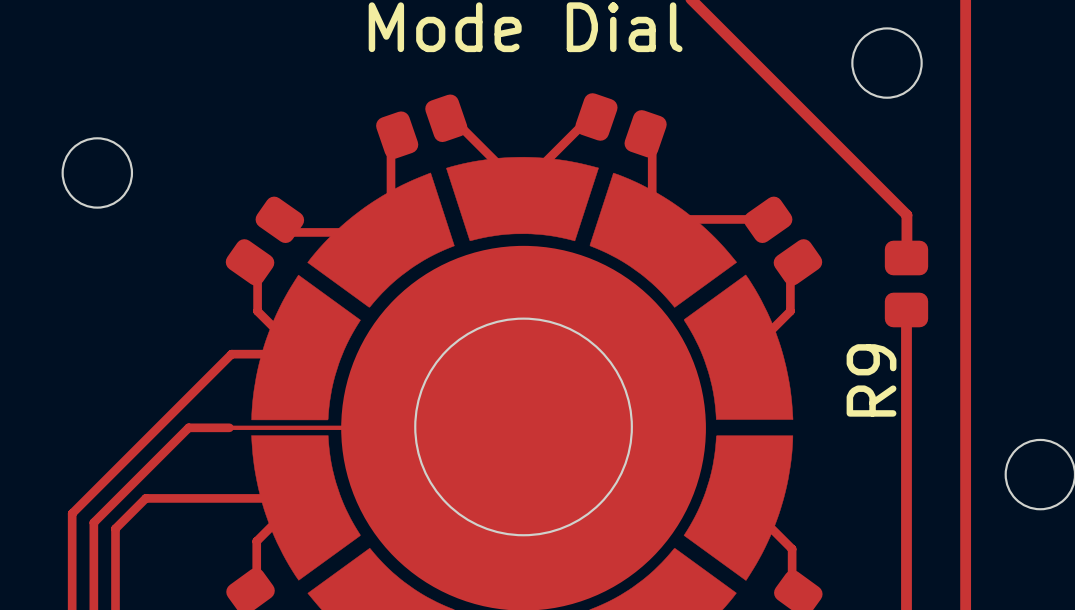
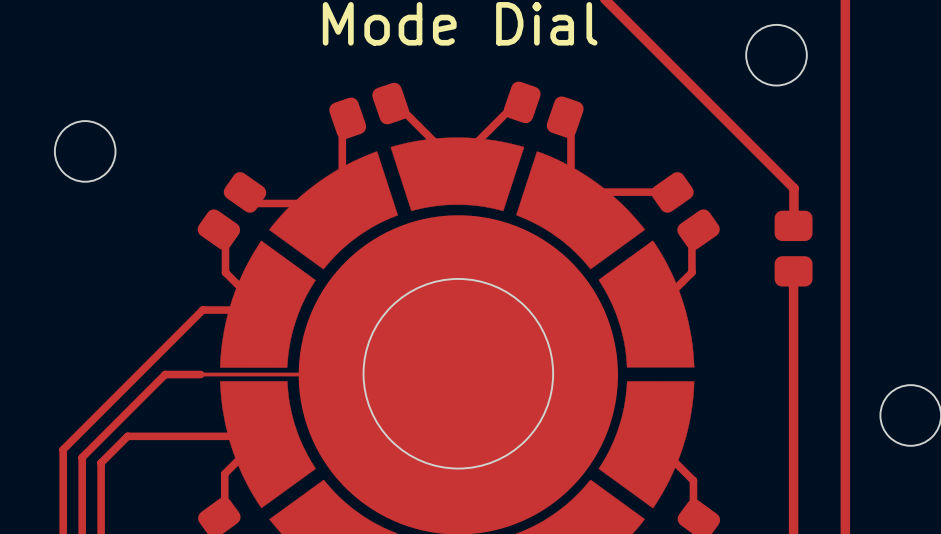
R9 name: R9 (871, 380) -> none

